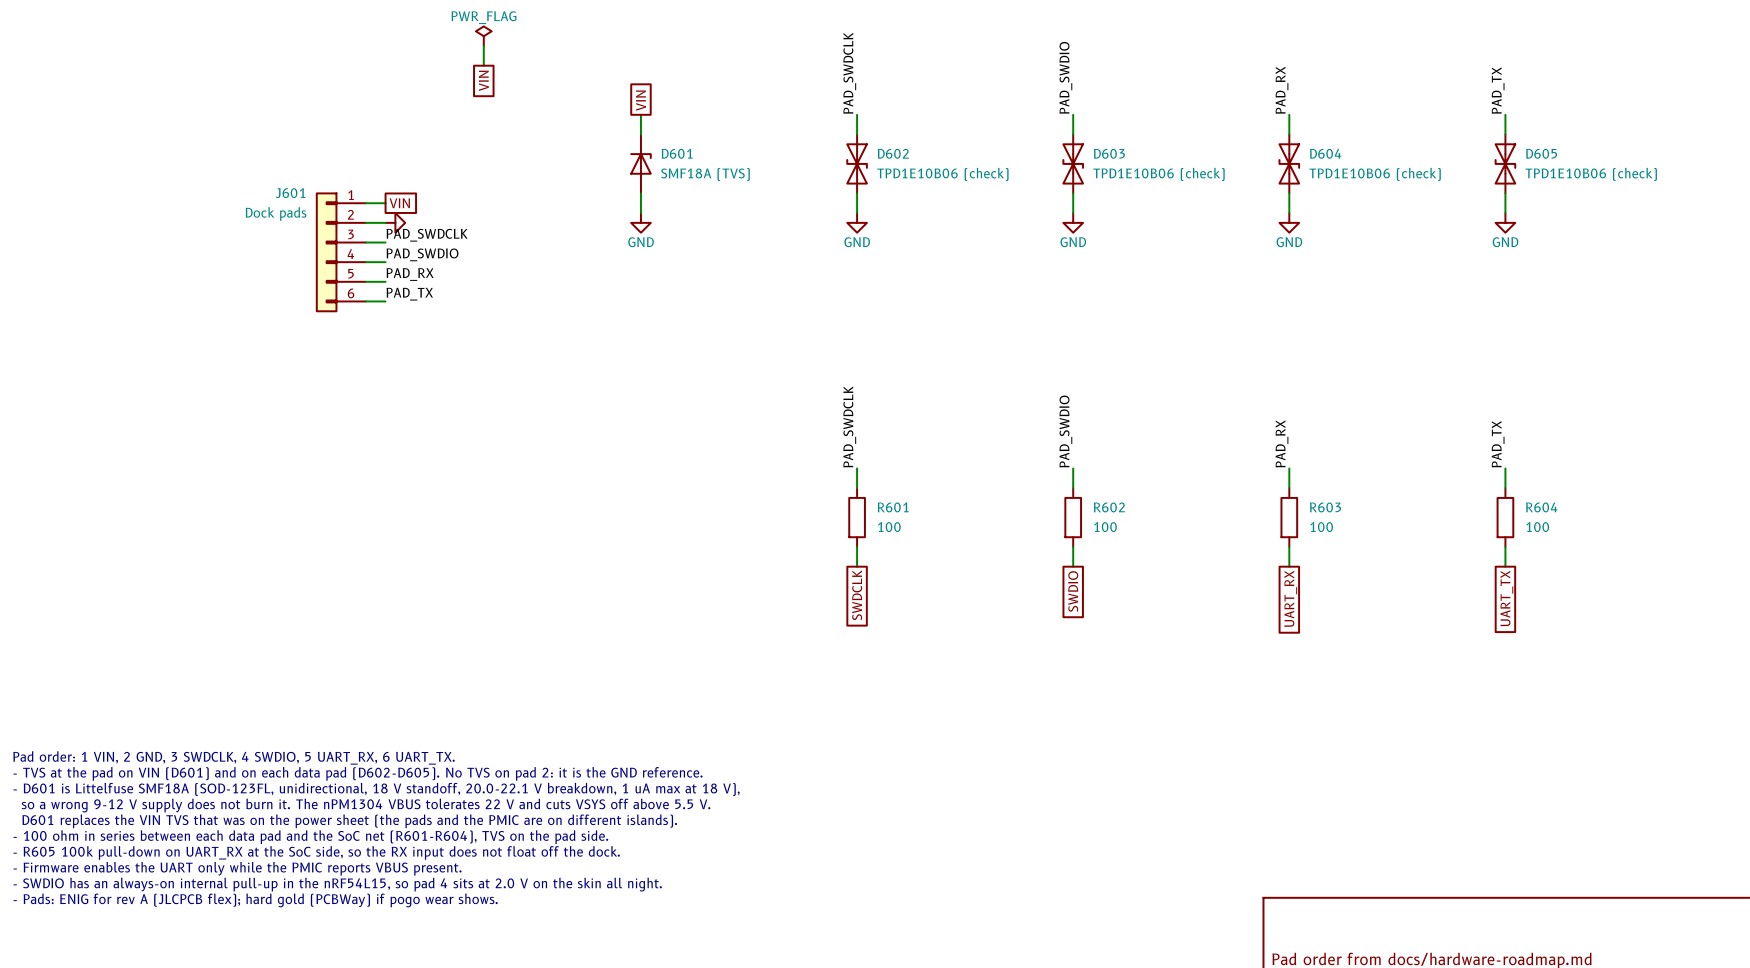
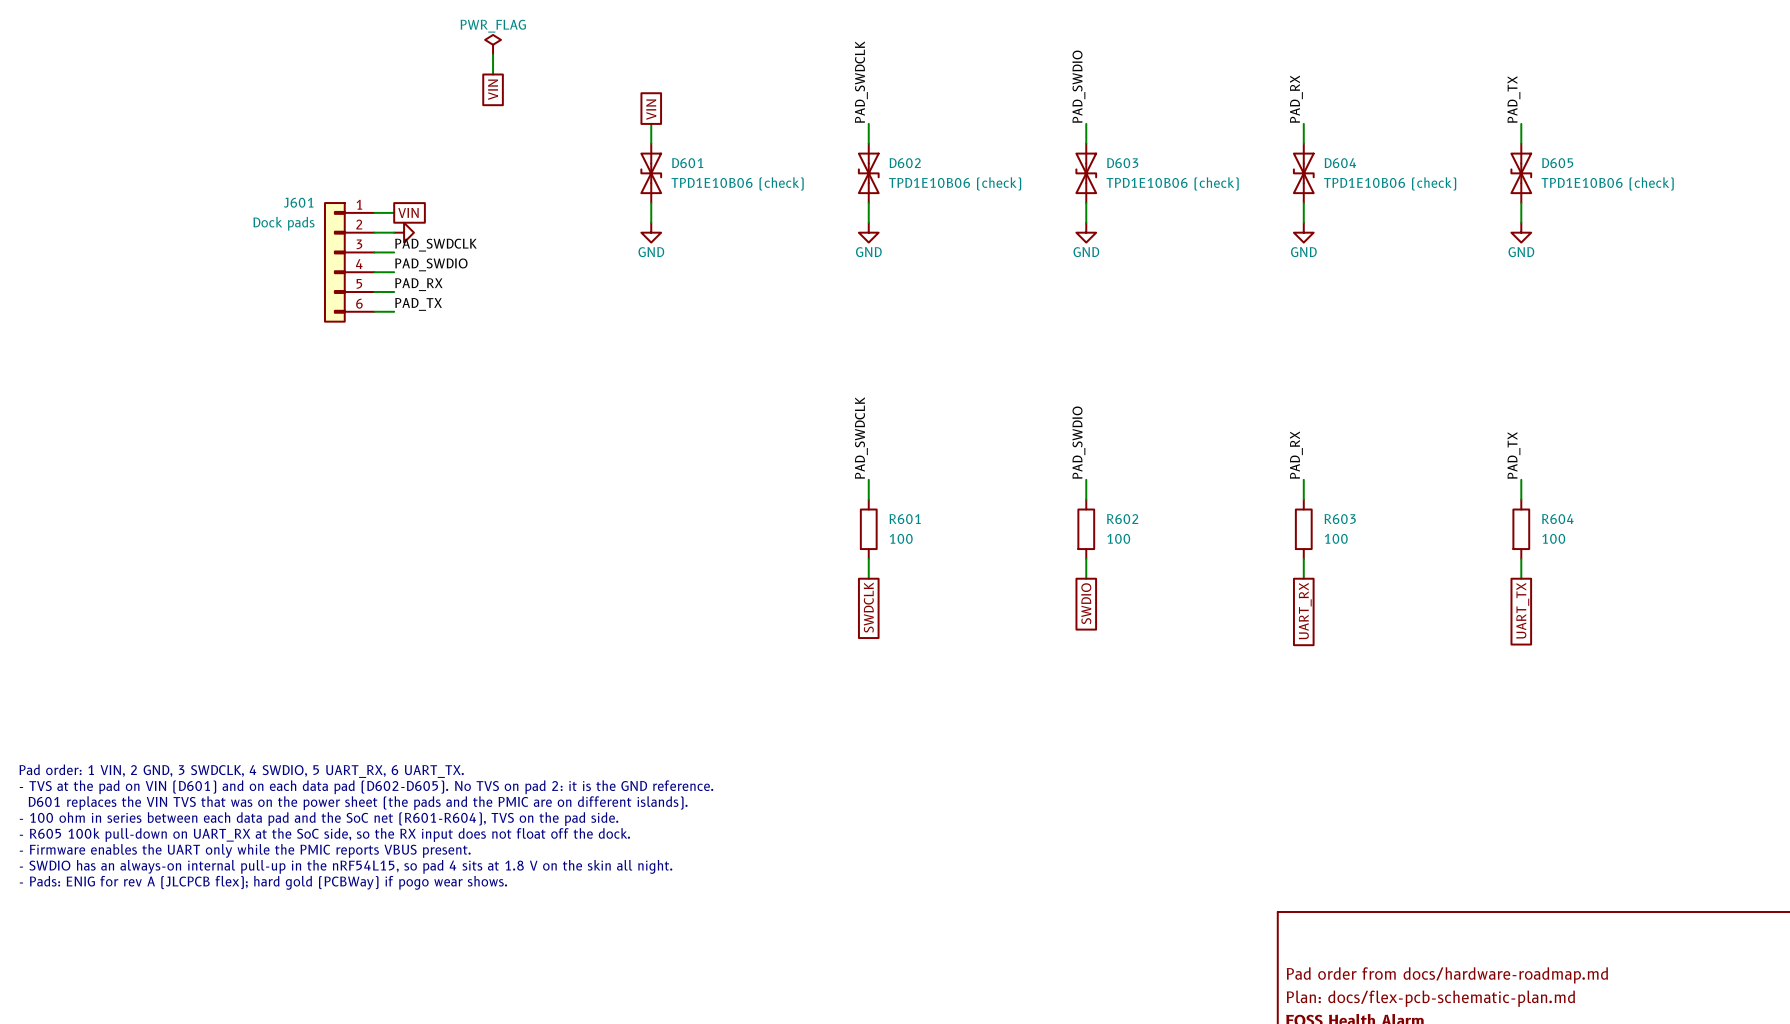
D601 symbol: [630, 134, 652, 194] -> [640, 143, 663, 204]
D601 value: SMF18A (TVS) (705, 174) -> TPD1E10B06 (check) (737, 183)
text: - D601 is Littelfuse SMF18A (SOD-123FL, unidirectional, 18 V standoff, 20.0-22.1 V breakdown, 1 uA max at 18 V), (376, 789) -> D601 replaces the VIN TVS that was on the power sheet (the pads and the PMIC are on different islands). (358, 803)
text: so a wrong 9-12 V supply does not burn it. The nPM1304 VBUS tolerates 22 V and cuts VSYS off above 5.5 V. (366, 805) -> - 100 ohm in series between each data pad and the SoC net (R601-R604), TVS on the pad side. (319, 819)
text: D601 replaces the VIN TVS that was on the power sheet (the pads and the PMIC are on different islands). (349, 821) -> - R605 100k pull-down on UART_RX at the SoC side, so the RX input does not float off the dock. (324, 835)
text: - 100 ohm in series between each data pad and the SoC net (R601-R604), TVS on the pad side. (310, 837) -> - Firmware enables the UART only while the PMIC reports VBUS present. (245, 850)
text: - R605 100k pull-down on UART_RX at the SoC side, so the RX input does not float off the dock. (316, 852) -> - SWDIO has an always-on internal pull-up in the nRF54L15, so pad 4 sits at 1.8 V on the skin all night. (346, 866)
text: - Firmware enables the UART only while the PMIC reports VBUS present. (237, 868) -> - Pads: ENIG for rev A (JLCPCB flex); hard gold (PCBWay) if pogo wear shows. (263, 882)
text: - SWDIO has an always-on internal pull-up in the nRF54L15, so pad 4 sits at 2.0 V on the skin all night. (337, 884) -> none
text: - Pads: ENIG for rev A (JLCPCB flex); hard gold (PCBWay) if pogo wear shows. (255, 900) -> none

